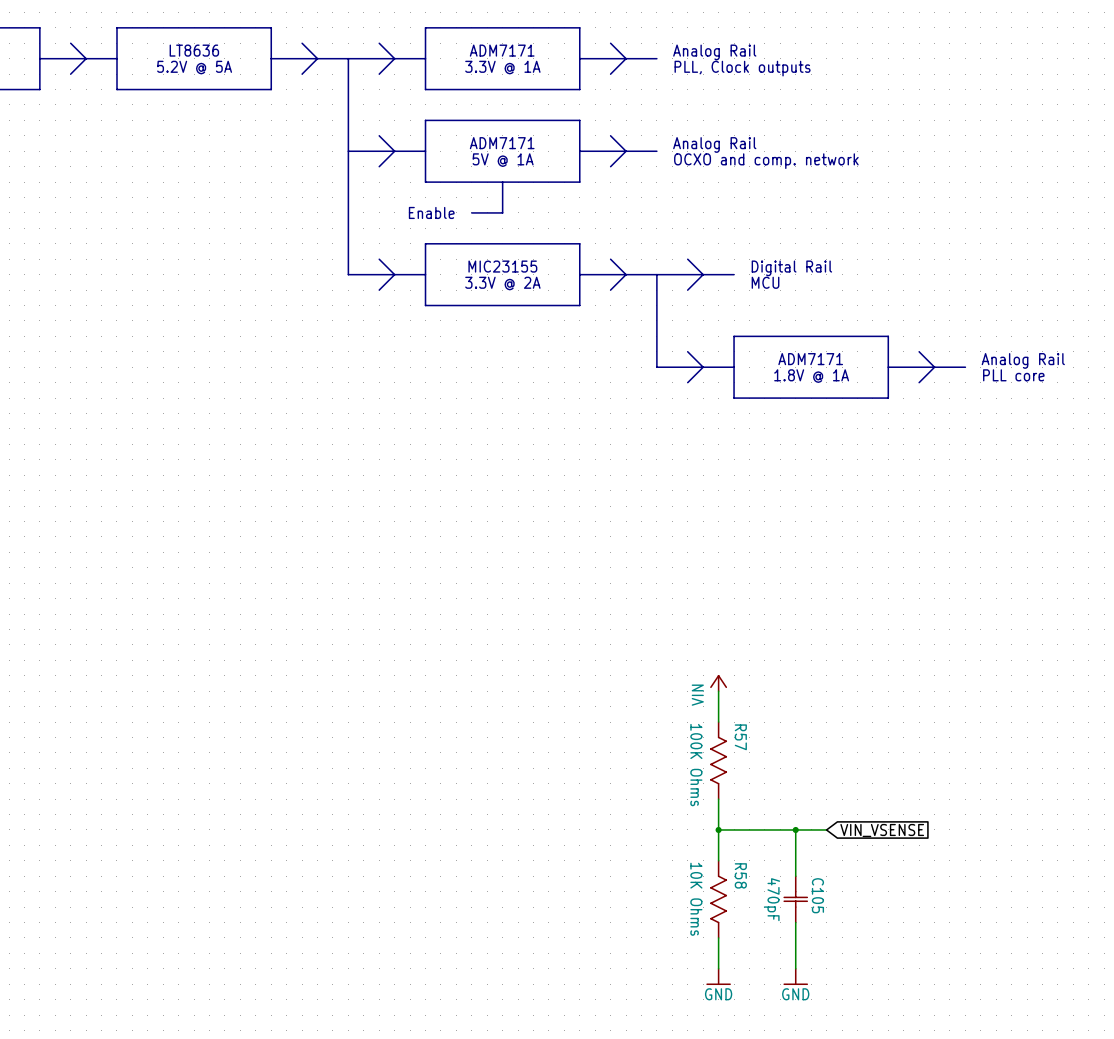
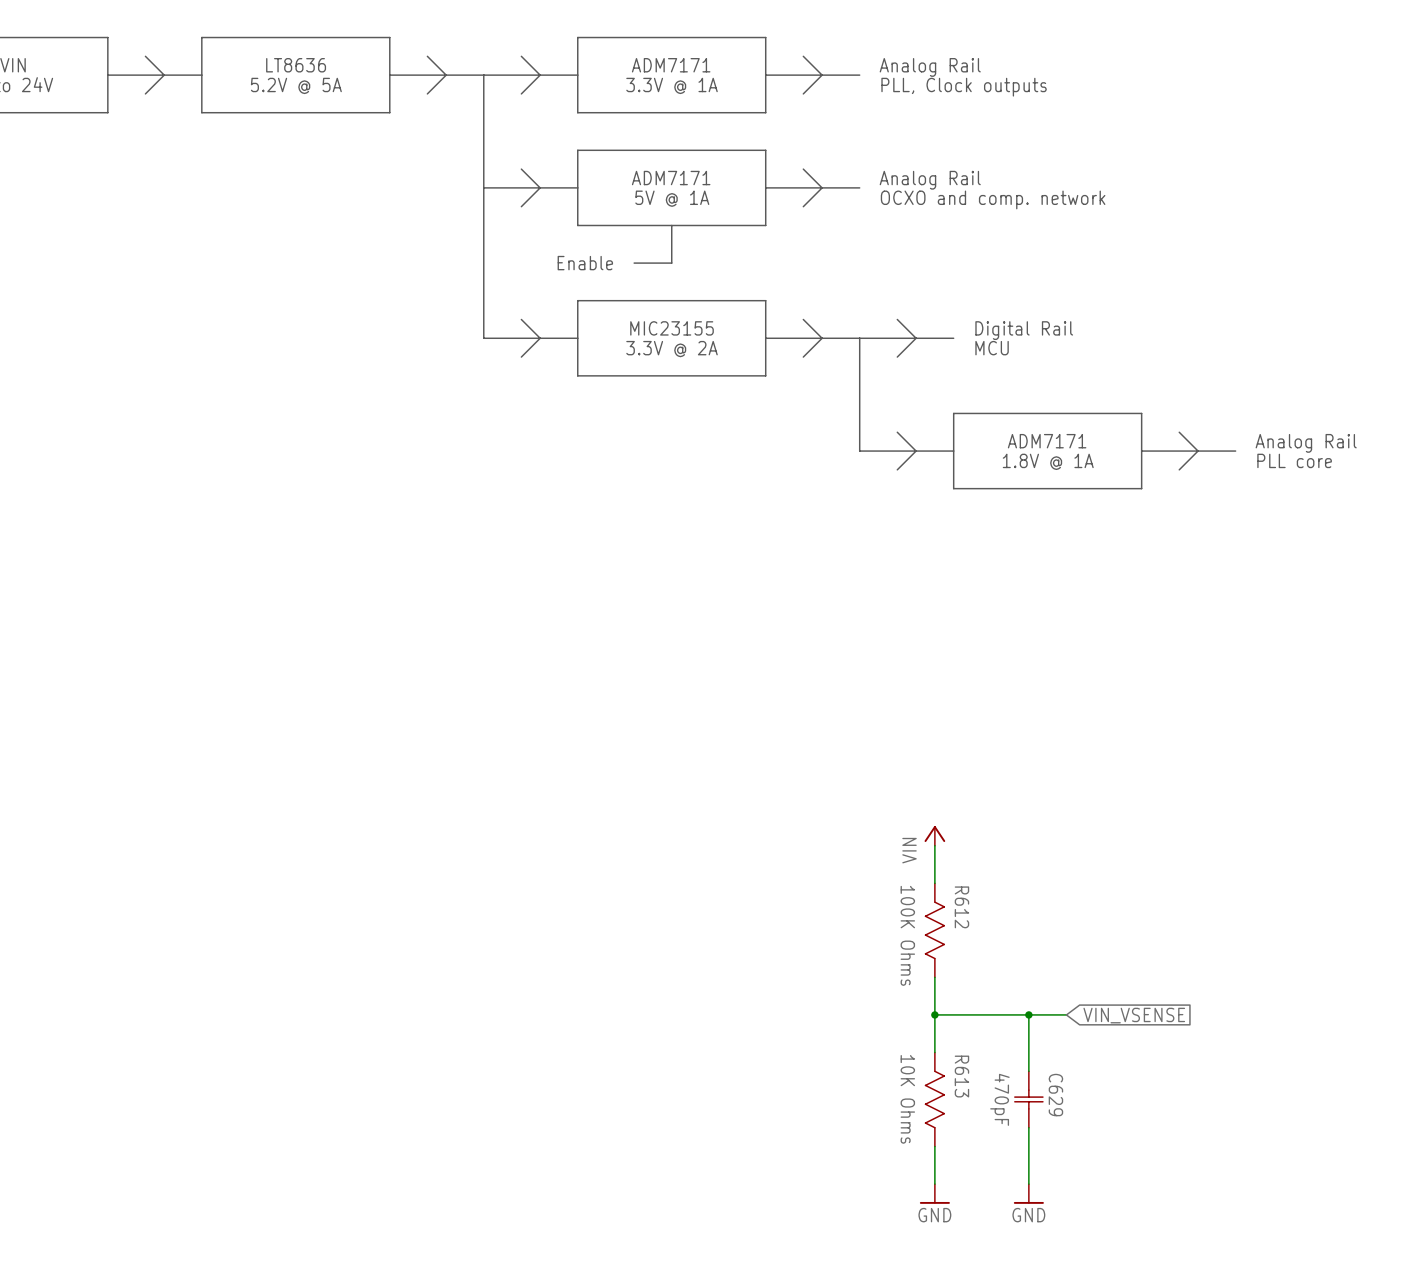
R57 name: R57 (740, 737) -> R612 (961, 907)
R58 name: R58 (740, 875) -> R613 (961, 1076)
C105 name: C105 (817, 895) -> C629 (1055, 1095)

